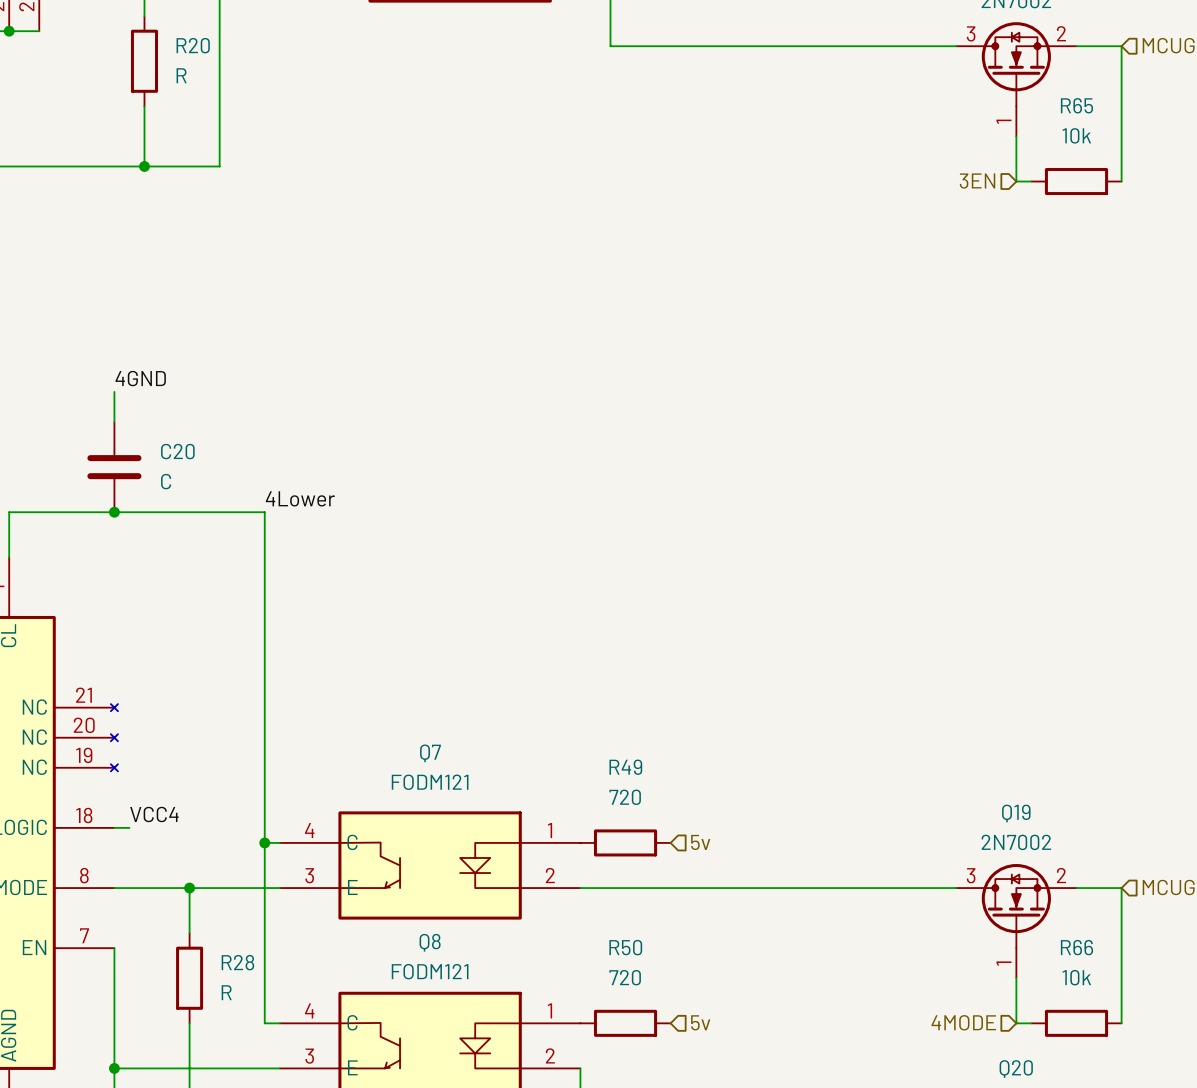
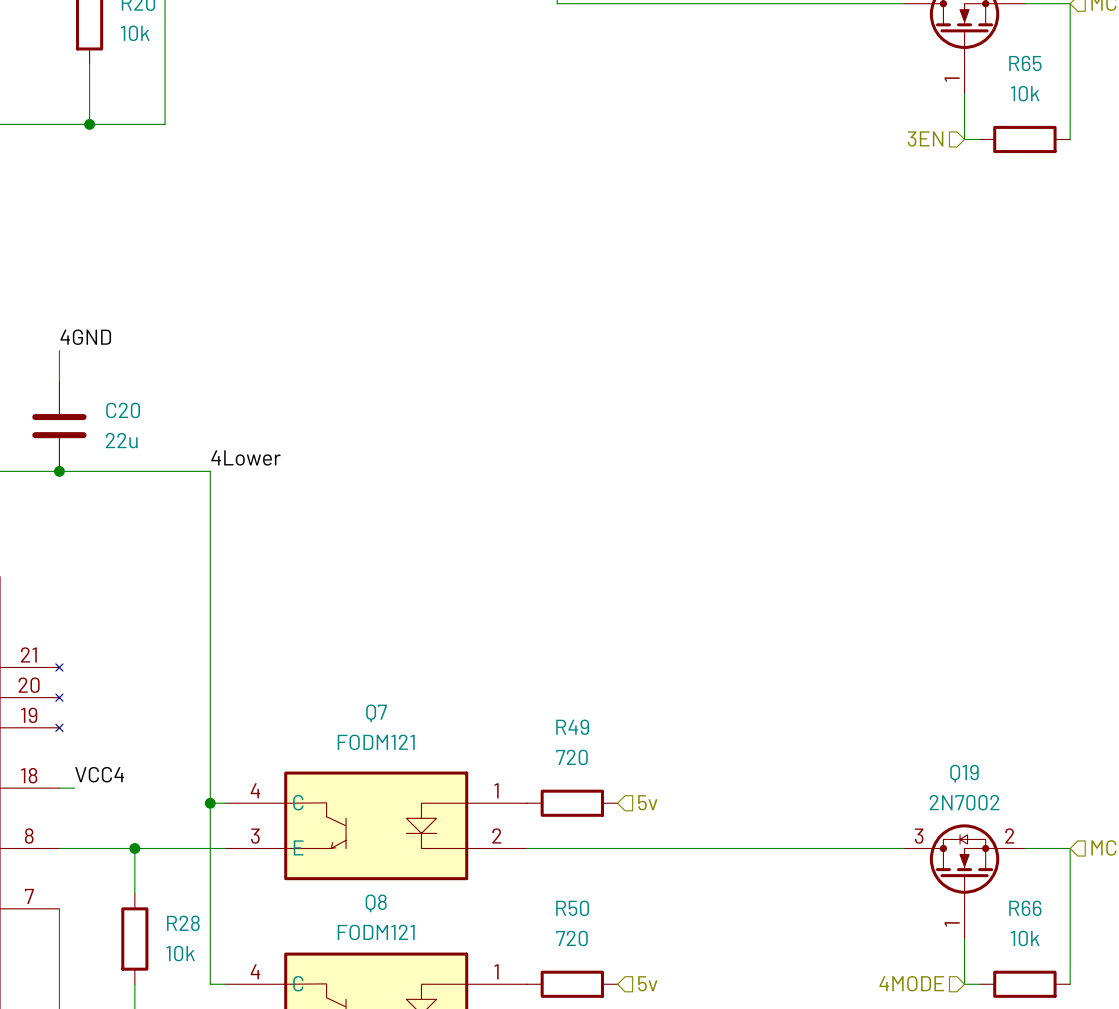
R20 value: R (181, 75) -> 10k (135, 33)
C20 value: C (166, 481) -> 22u (121, 440)
R28 value: R (226, 992) -> 10k (180, 953)

